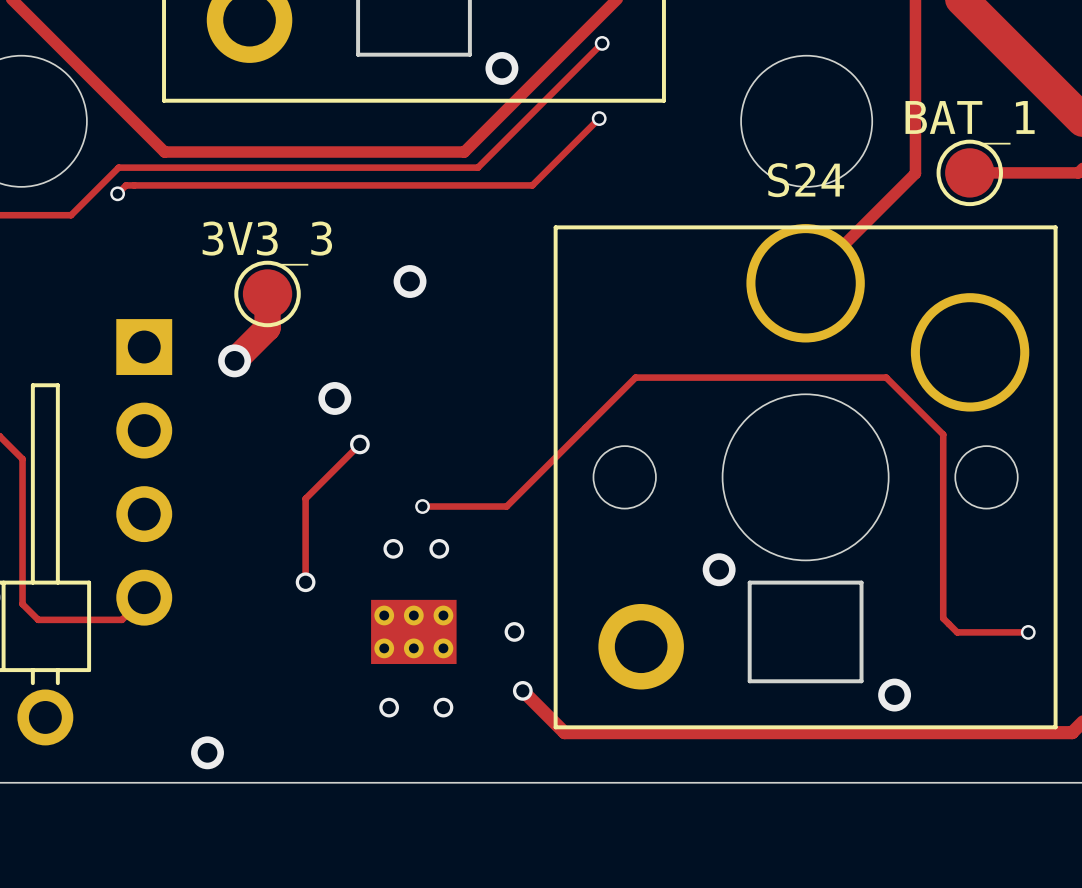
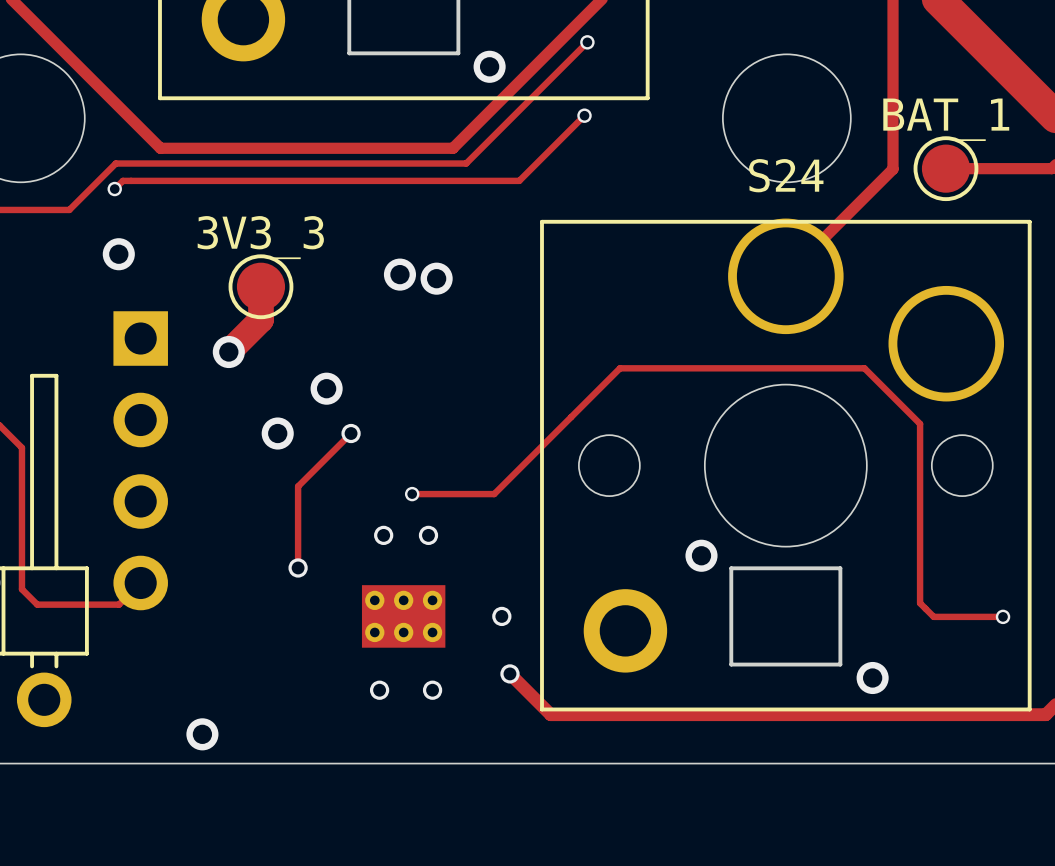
via: none -> (118, 254)
via: none -> (436, 278)
via: none -> (277, 433)

